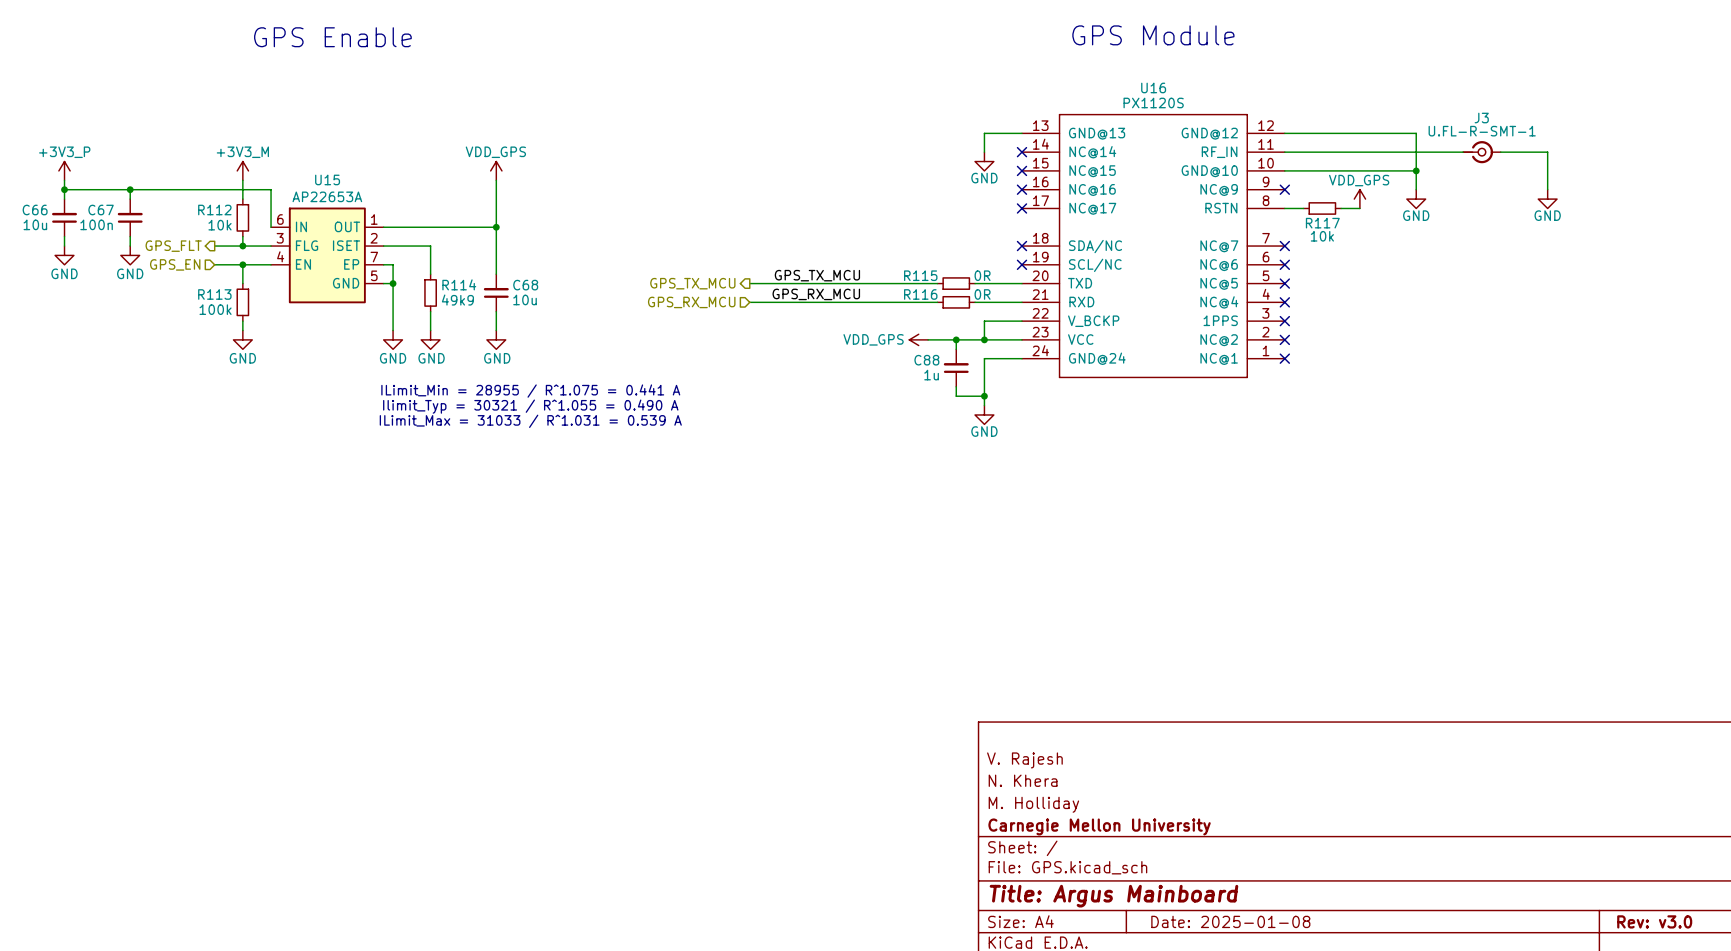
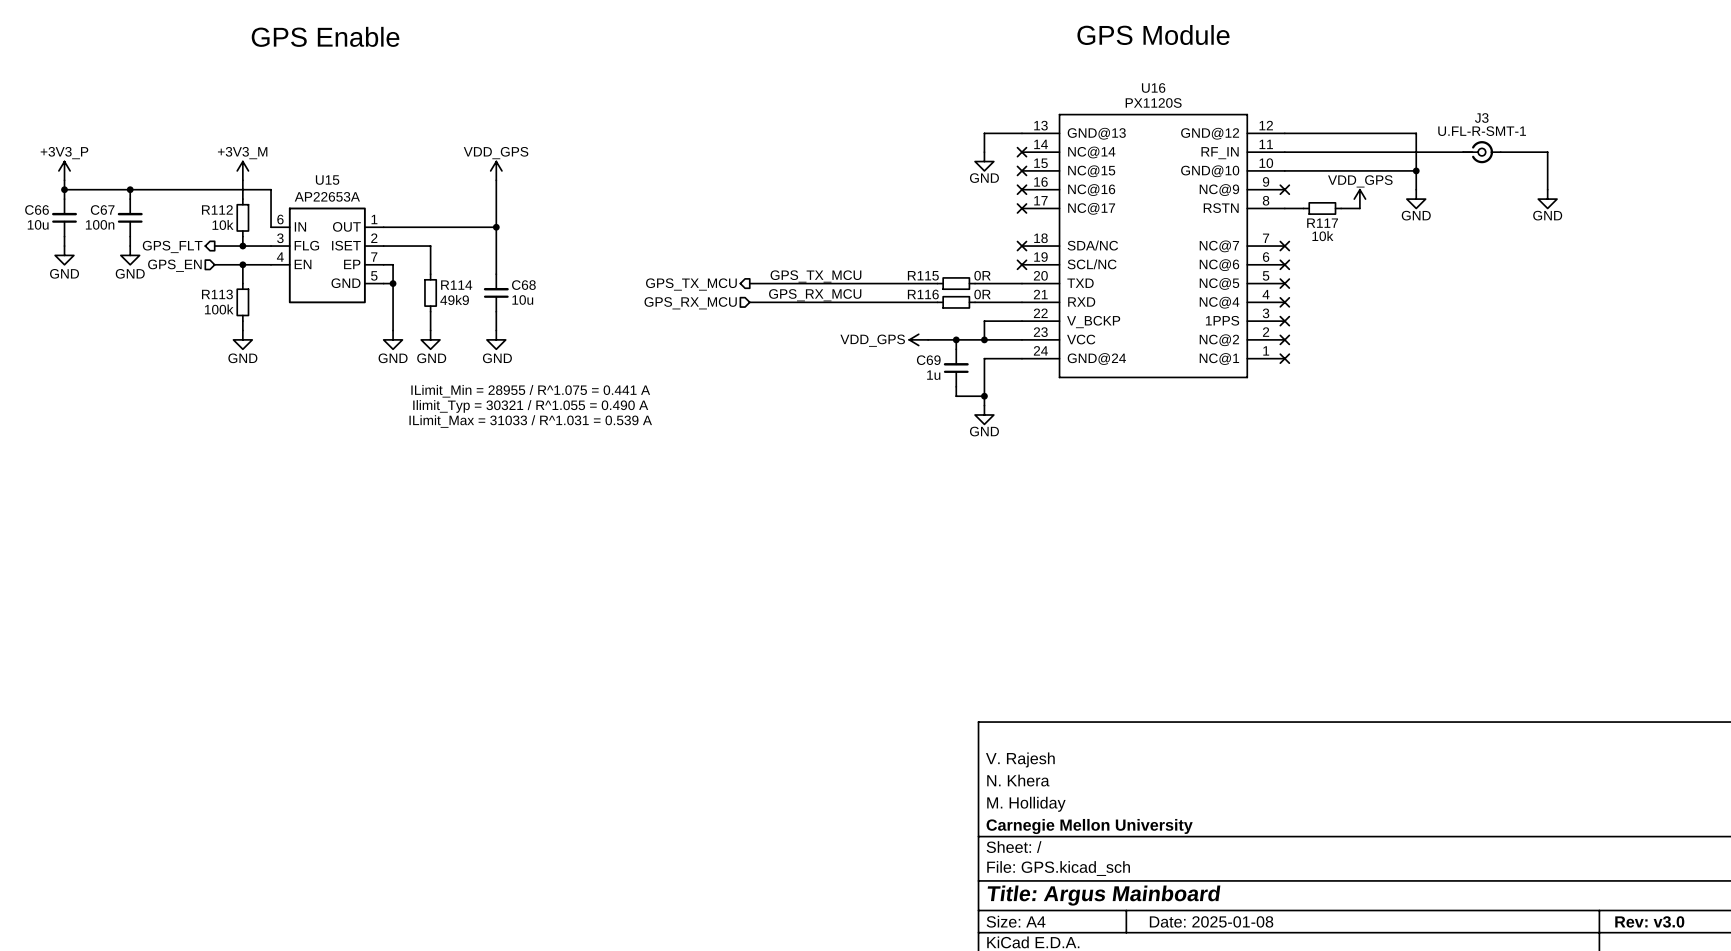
C88 name: C88 (926, 360) -> C69 (928, 360)

